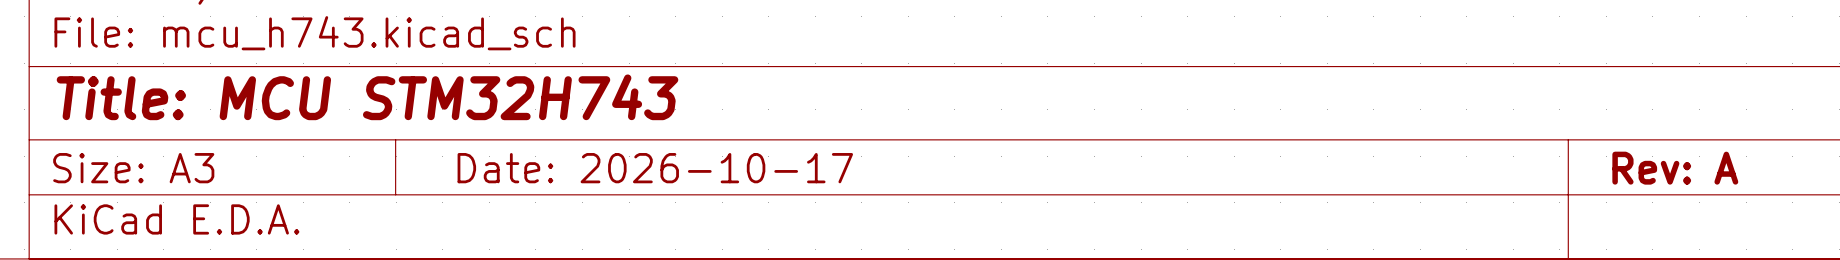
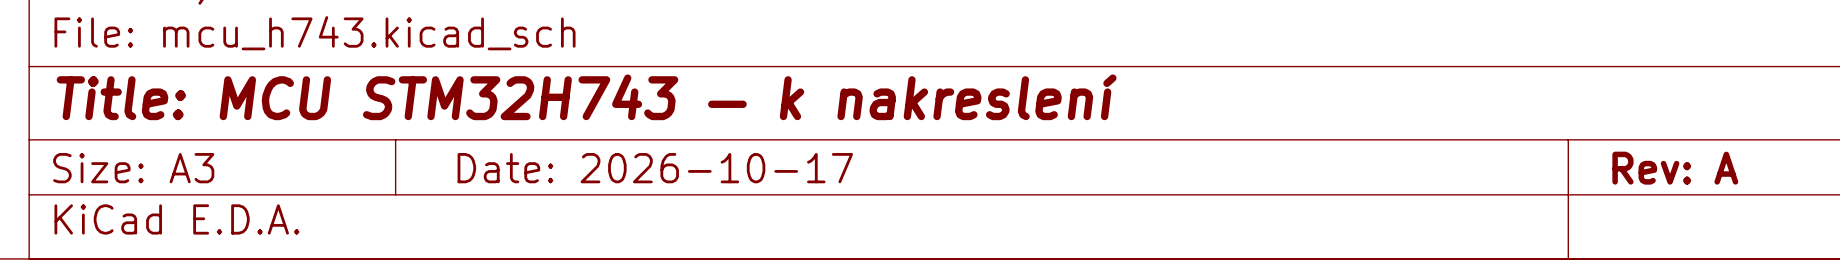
title block: Title: MCU STM32H743 (367, 97) -> Title: MCU STM32H743 — k nakreslení (586, 97)

